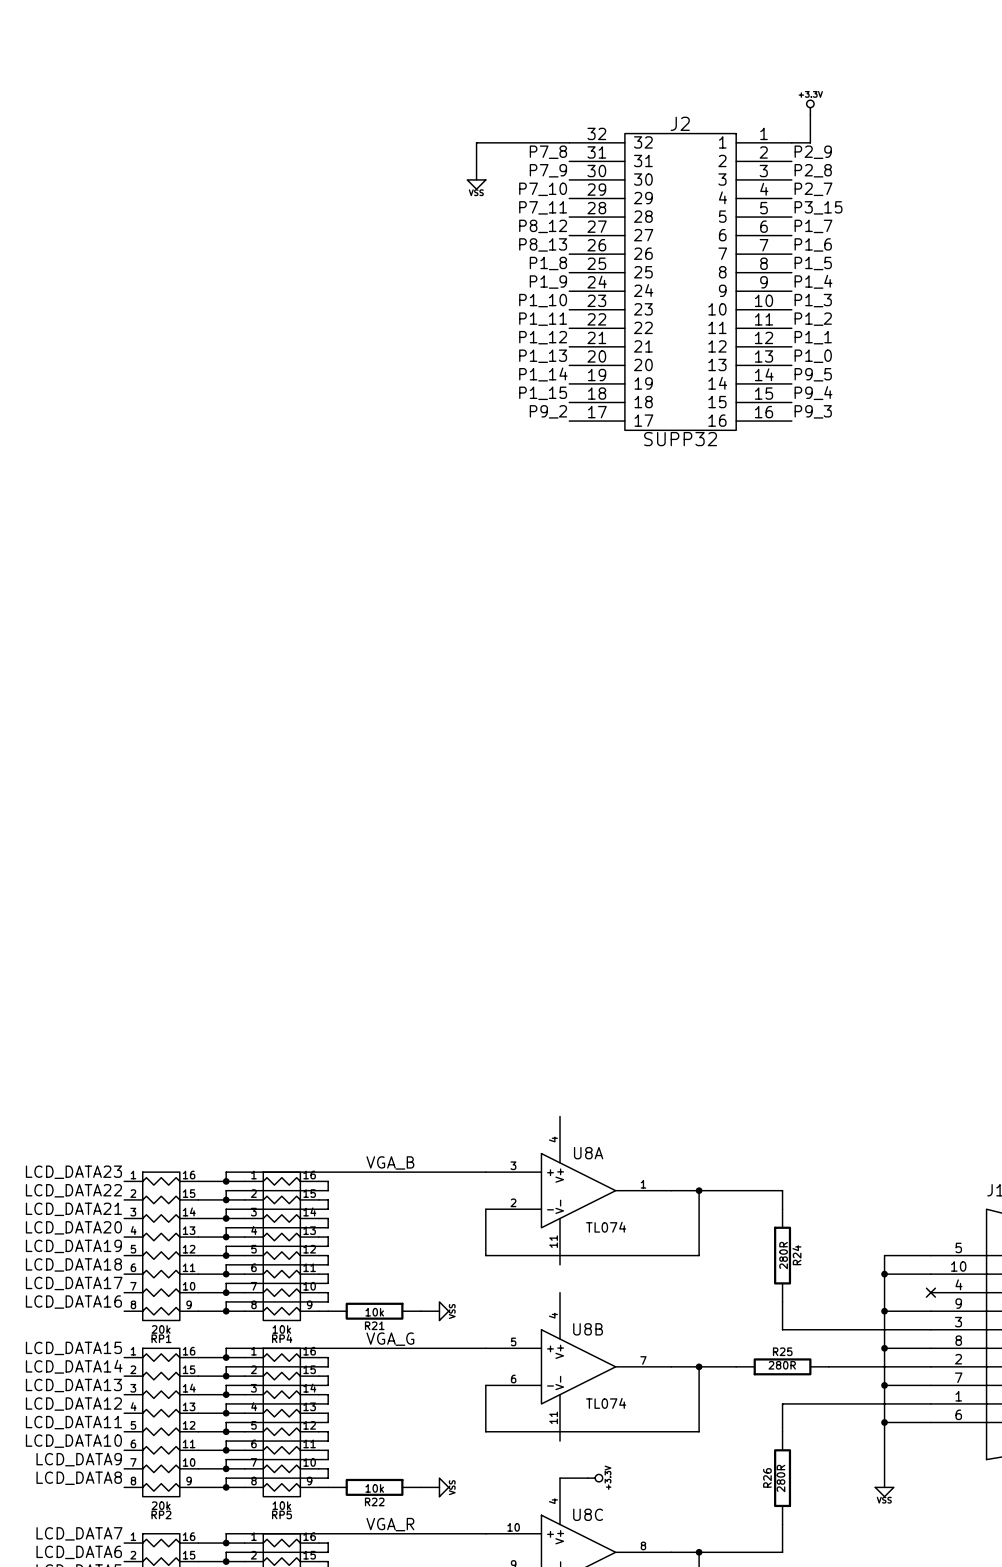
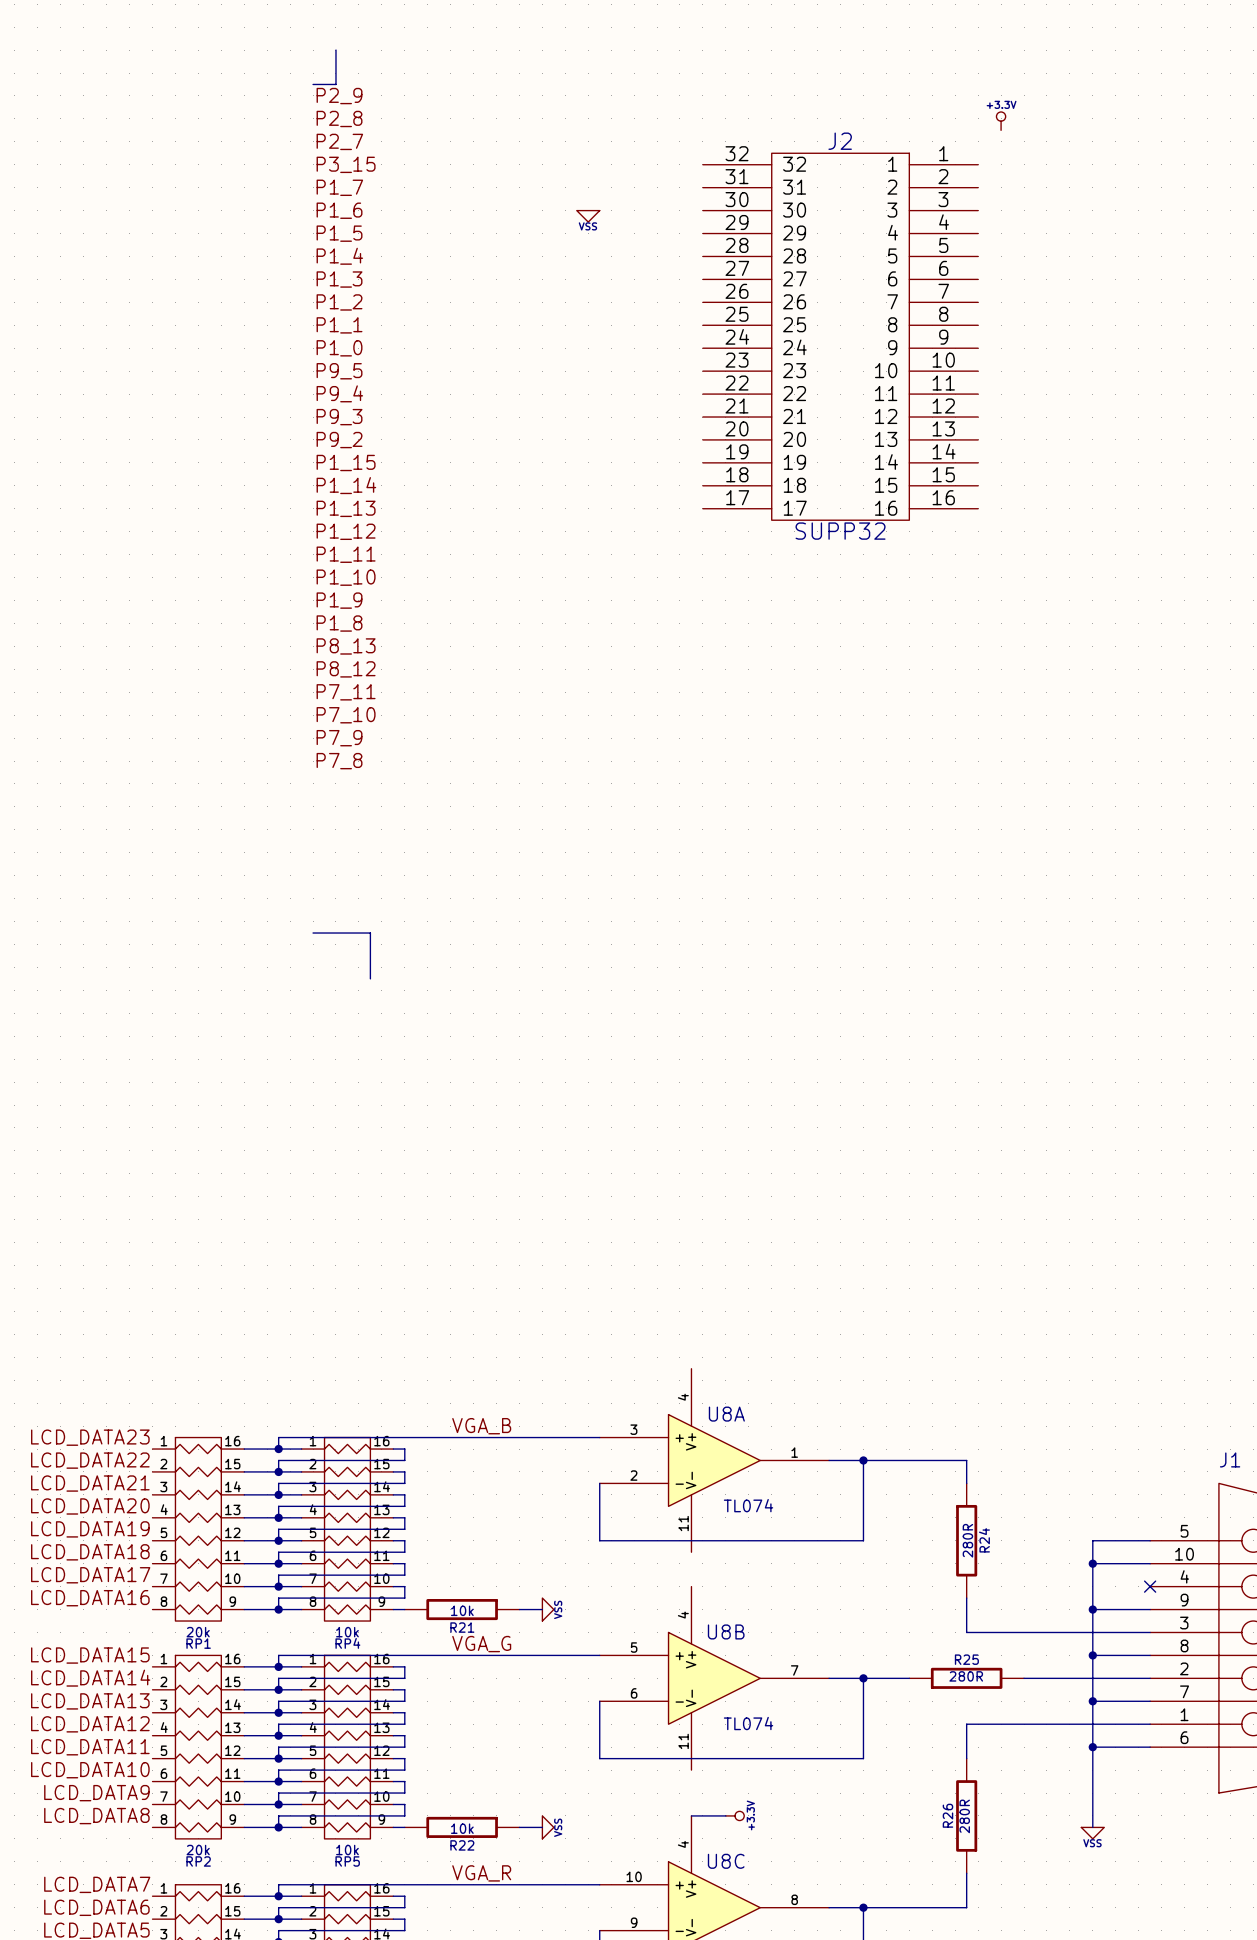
wire: none -> (335, 50) (335, 84) (313, 84)
label: none -> P2_9 (339, 96)
label: none -> P2_8 (339, 118)
wire: (810, 115) (810, 142) (791, 142) -> none
label: none -> P2_7 (339, 141)
label: none -> P3_15 (346, 164)
wire: (569, 142) (476, 142) (476, 179) -> none
label: P7_8 (548, 152) -> none
label: P2_9 (813, 152) -> none
label: none -> P1_7 (339, 187)
label: P7_9 (548, 170) -> none
label: P2_8 (813, 170) -> none
label: none -> P1_6 (339, 210)
label: P7_10 (543, 189) -> none
label: P2_7 (813, 189) -> none
label: none -> P1_5 (339, 233)
label: P7_11 (543, 207) -> none
label: P3_15 (818, 207) -> none
label: none -> P1_4 (339, 256)
label: P8_12 (543, 226) -> none
label: P1_7 (813, 226) -> none
label: none -> P1_3 (339, 279)
label: P8_13 (543, 244) -> none
label: P1_6 (813, 244) -> none
label: none -> P1_2 (339, 302)
label: P1_8 (548, 263) -> none
label: P1_5 (813, 263) -> none
label: none -> P1_1 (339, 325)
label: P1_4 (813, 281) -> none
label: P1_9 (548, 282) -> none
label: none -> P1_0 (339, 348)
label: P1_10 (543, 300) -> none
label: P1_3 (813, 300) -> none
label: none -> P9_5 (339, 371)
label: P1_11 (543, 319) -> none
label: P1_2 (813, 319) -> none
label: none -> P9_4 (339, 393)
label: P1_12 (543, 337) -> none
label: P1_1 (813, 337) -> none
label: none -> P9_3 (339, 417)
label: P1_13 (543, 356) -> none
label: P1_0 (813, 356) -> none
label: none -> P9_2 (339, 440)
label: P1_14 (543, 374) -> none
label: P9_5 (813, 374) -> none
label: none -> P1_15 (346, 462)
label: P1_15 (543, 393) -> none
label: P9_4 (813, 393) -> none
label: none -> P1_14 (346, 485)
label: P9_2 (548, 411) -> none
label: P9_3 (813, 411) -> none
label: none -> P1_13 (346, 508)
label: none -> P1_12 (346, 531)
label: none -> P1_11 (346, 554)
label: none -> P1_10 (346, 577)
label: none -> P1_9 (339, 600)
label: none -> P1_8 (339, 623)
label: none -> P8_13 (346, 646)
label: none -> P8_12 (346, 669)
label: none -> P7_11 (346, 692)
label: none -> P7_10 (346, 715)
label: none -> P7_9 (339, 738)
label: none -> P7_8 (339, 761)
wire: none -> (313, 933) (370, 933) (370, 978)

